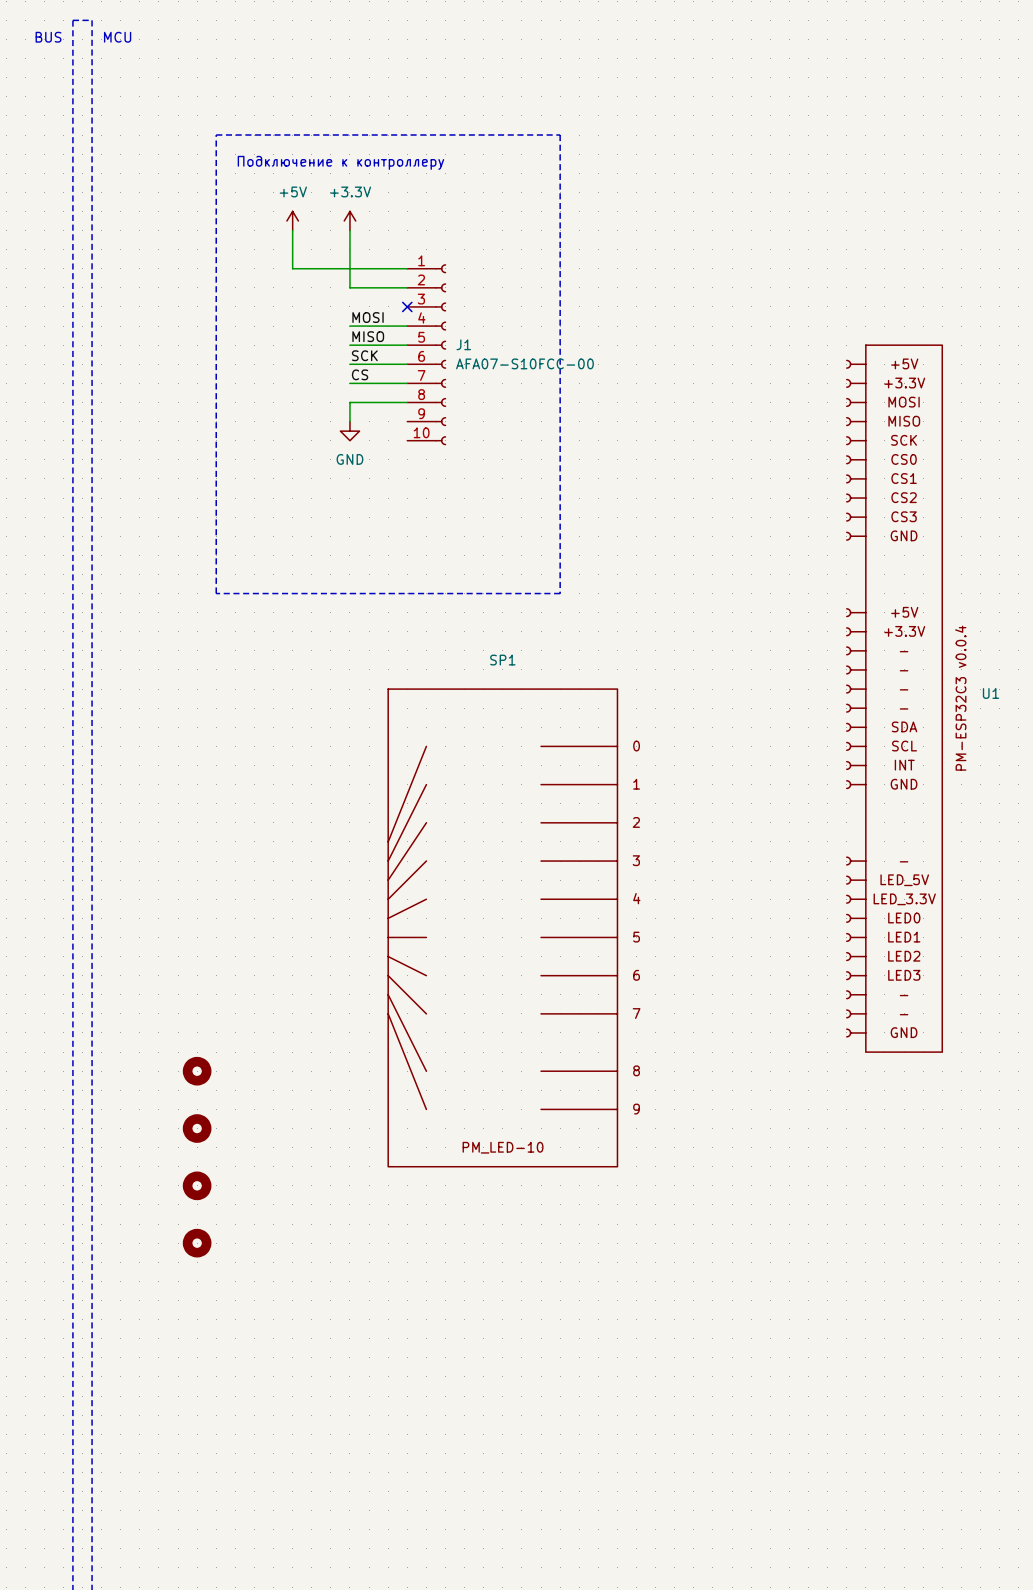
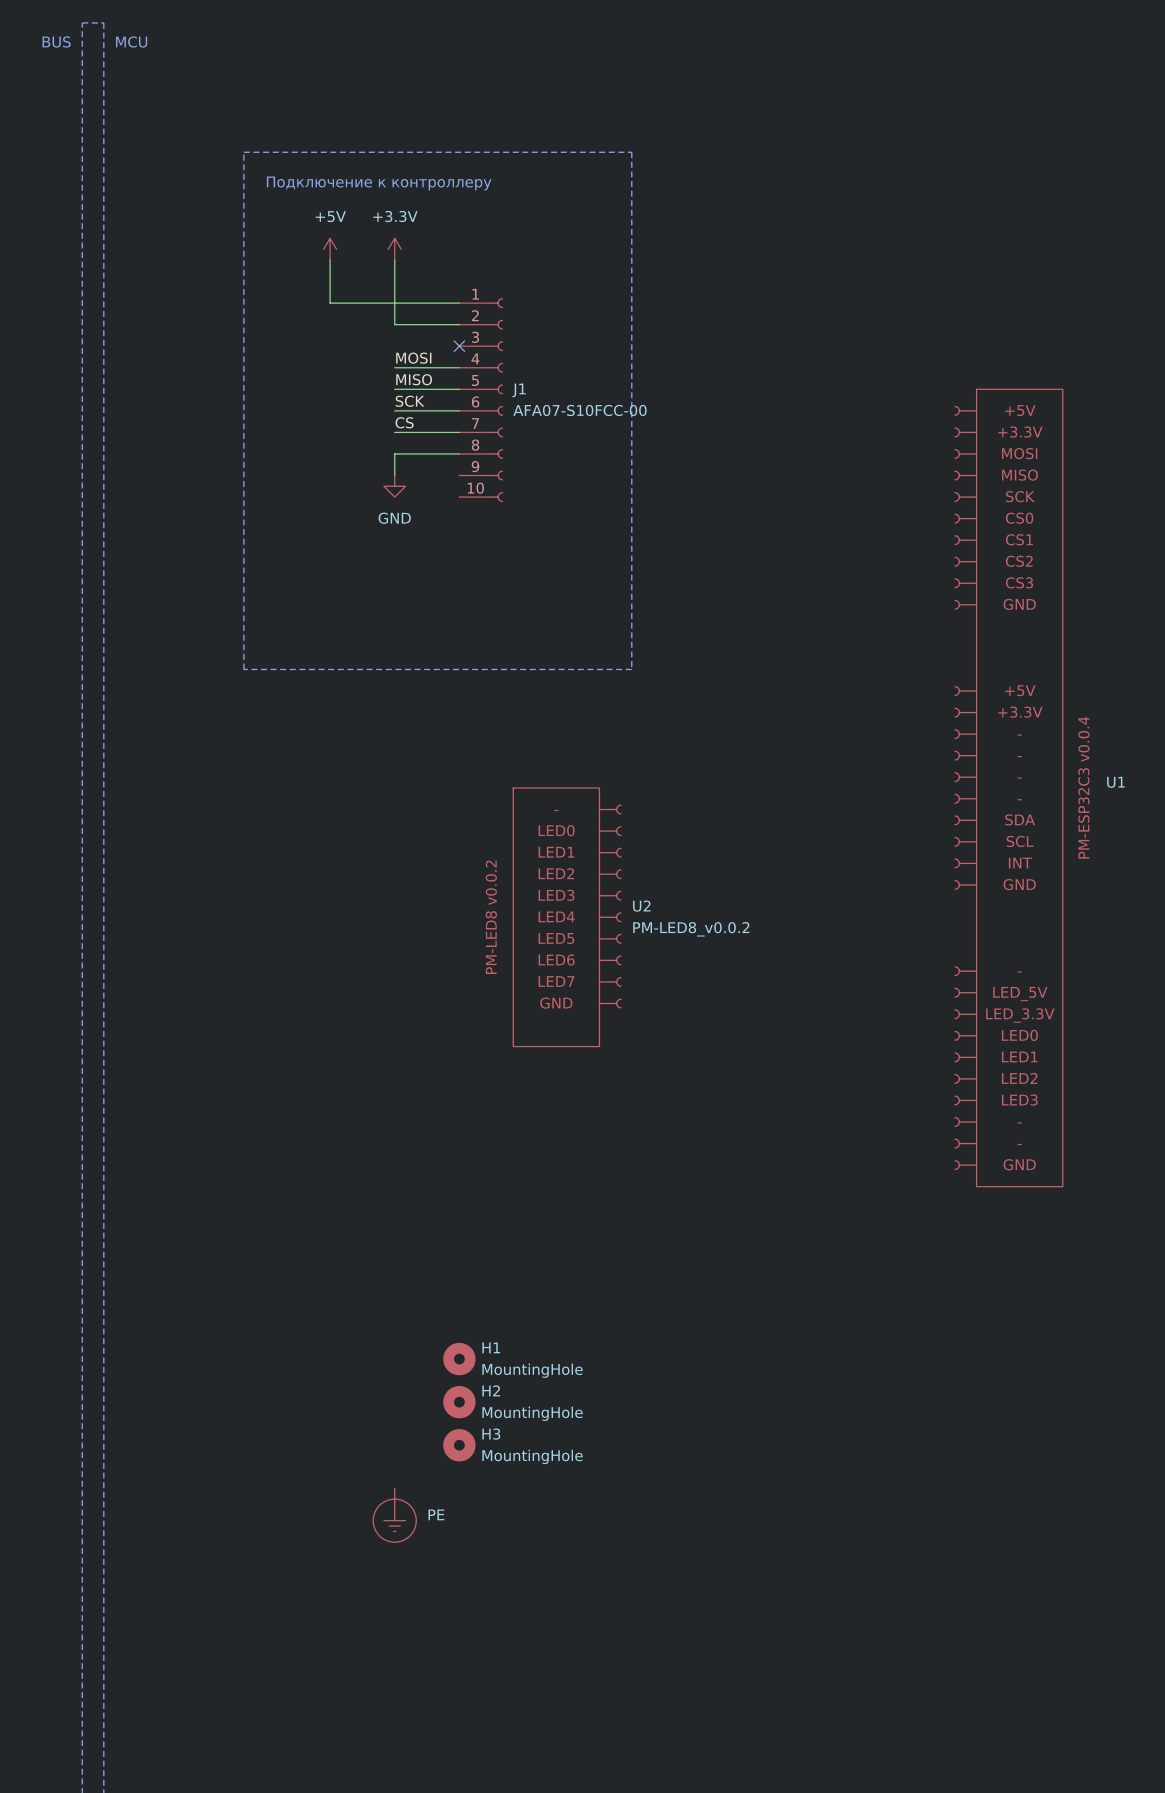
U2: none -> PM-LED8_v0.0.2 (567, 917)
SP1: (502, 927) -> none
part: (197, 1071) -> none
part: (197, 1128) -> none
part: (197, 1185) -> none
H1: none -> MountingHole (459, 1359)
part: (197, 1243) -> none
H2: none -> MountingHole (459, 1402)
H3: none -> MountingHole (459, 1445)
part: none -> PE (394, 1515)

